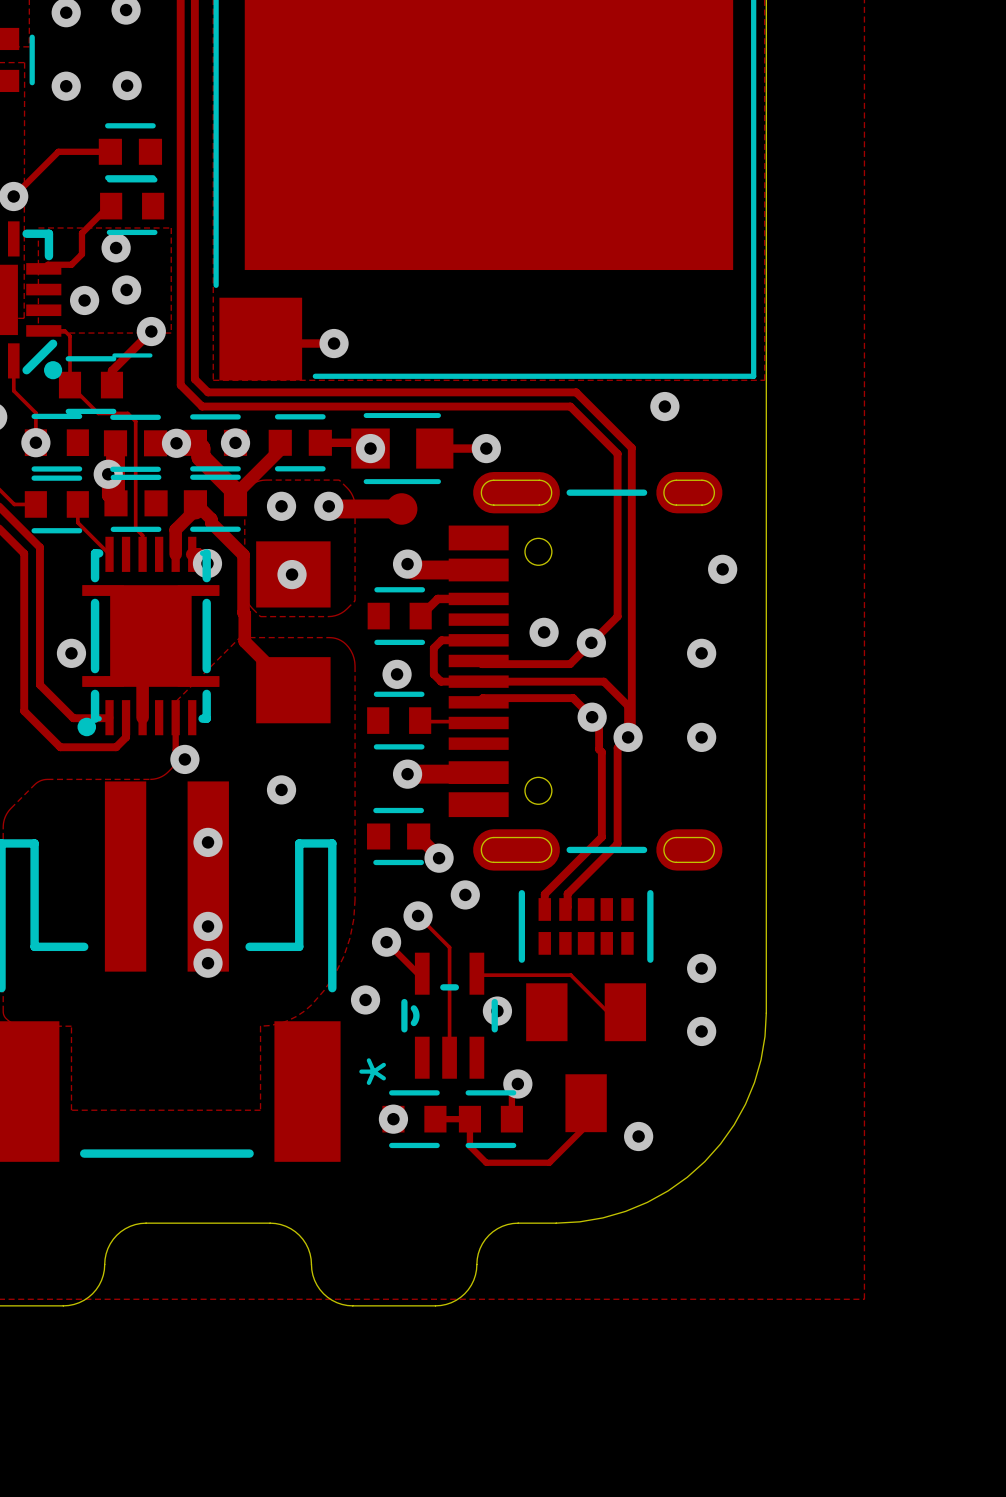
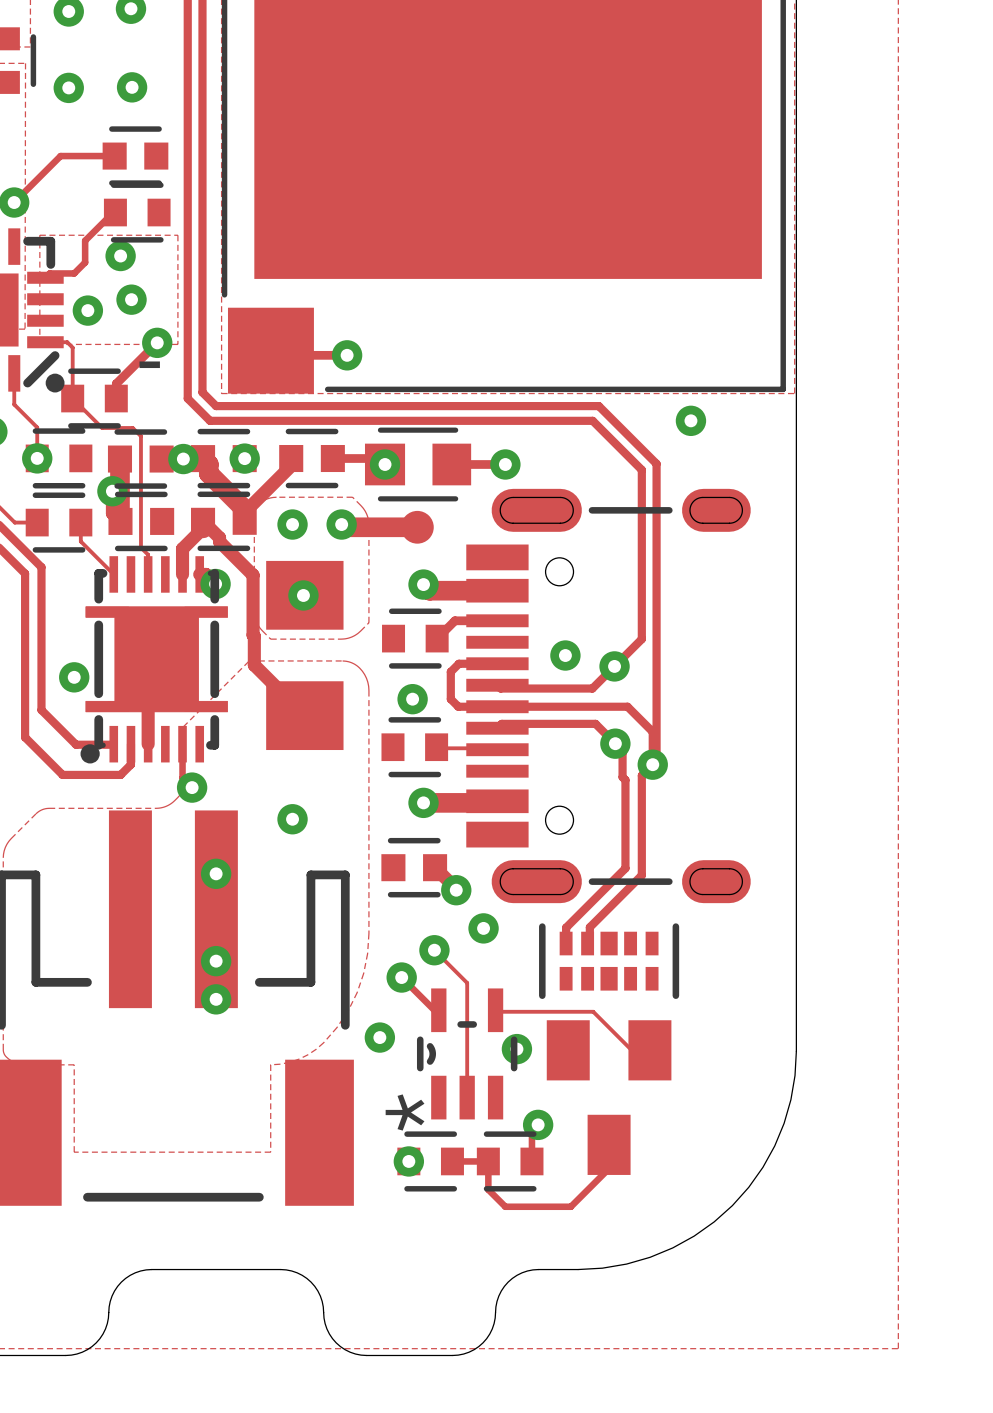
via: (722, 569) -> none
via: (701, 653) -> none
via: (701, 737) -> none
via: (701, 968) -> none
via: (701, 1031) -> none
via: (638, 1136) -> none

